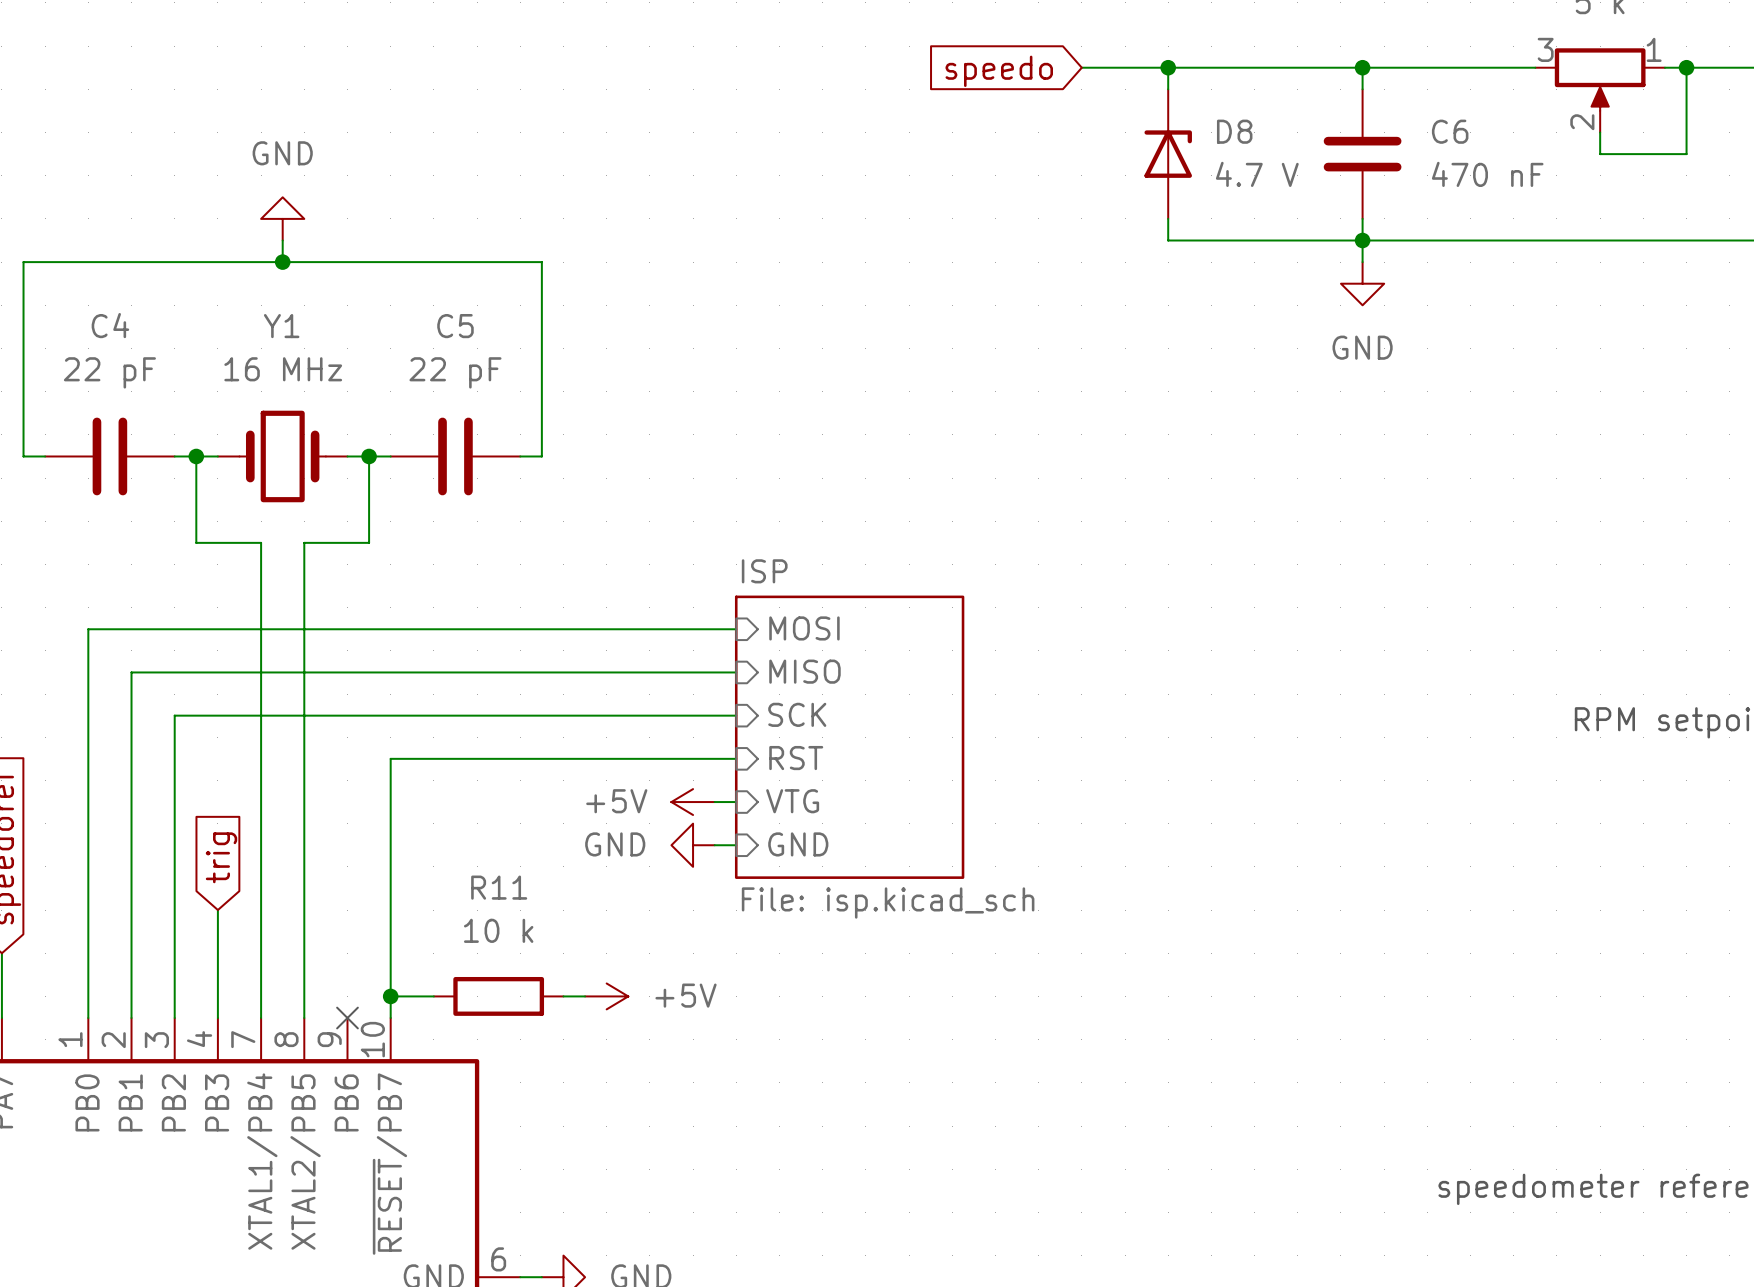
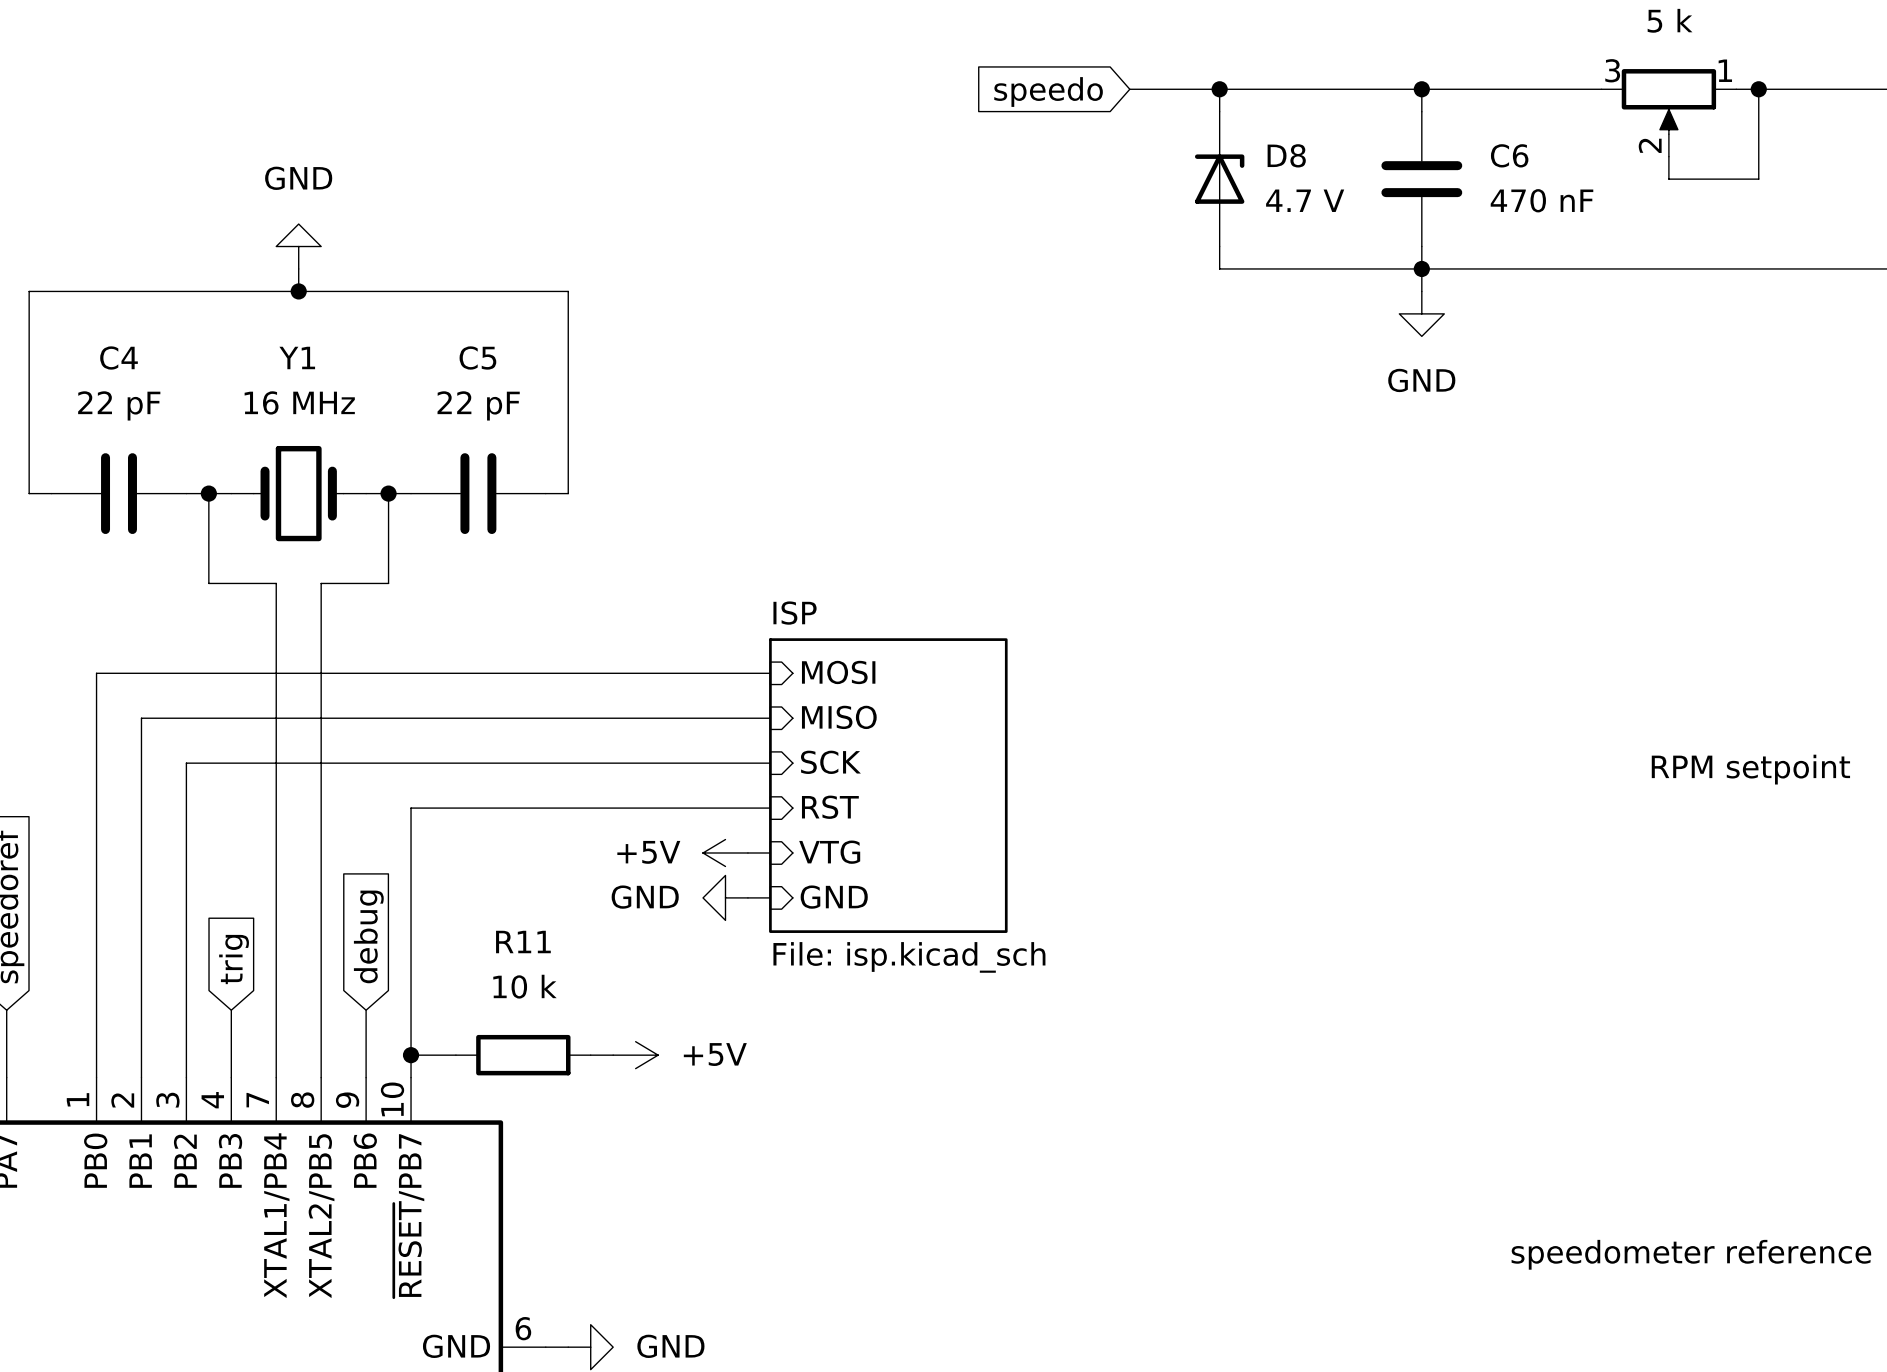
global label position: trig (221, 857) -> trig (234, 959)
global label: none -> debug (368, 936)
wire: (217, 910) (217, 953) -> none
wire: none -> (366, 1010) (366, 1077)
no-connect mark: (347, 1018) -> none

